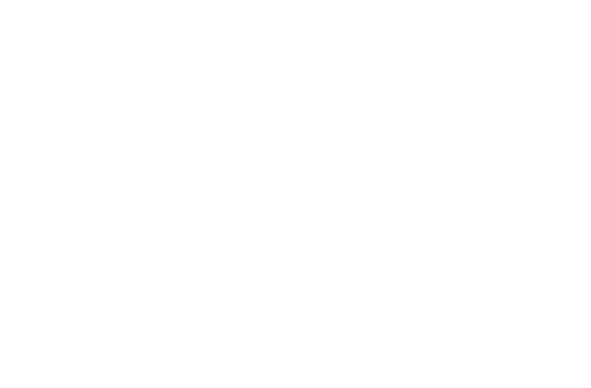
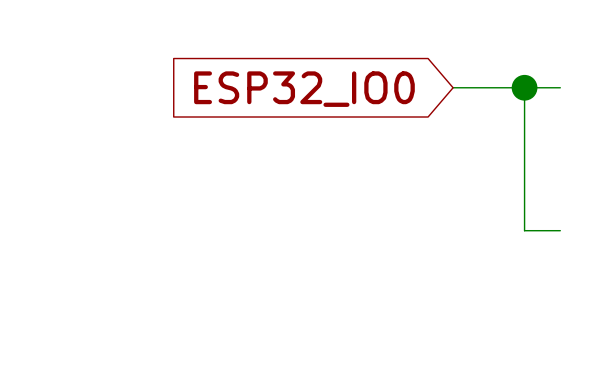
wire: none -> (453, 87) (560, 87)
wire: none -> (524, 87) (524, 230) (560, 230)
junction: none -> (524, 87)
global label: none -> ESP32_IO0 (304, 89)

